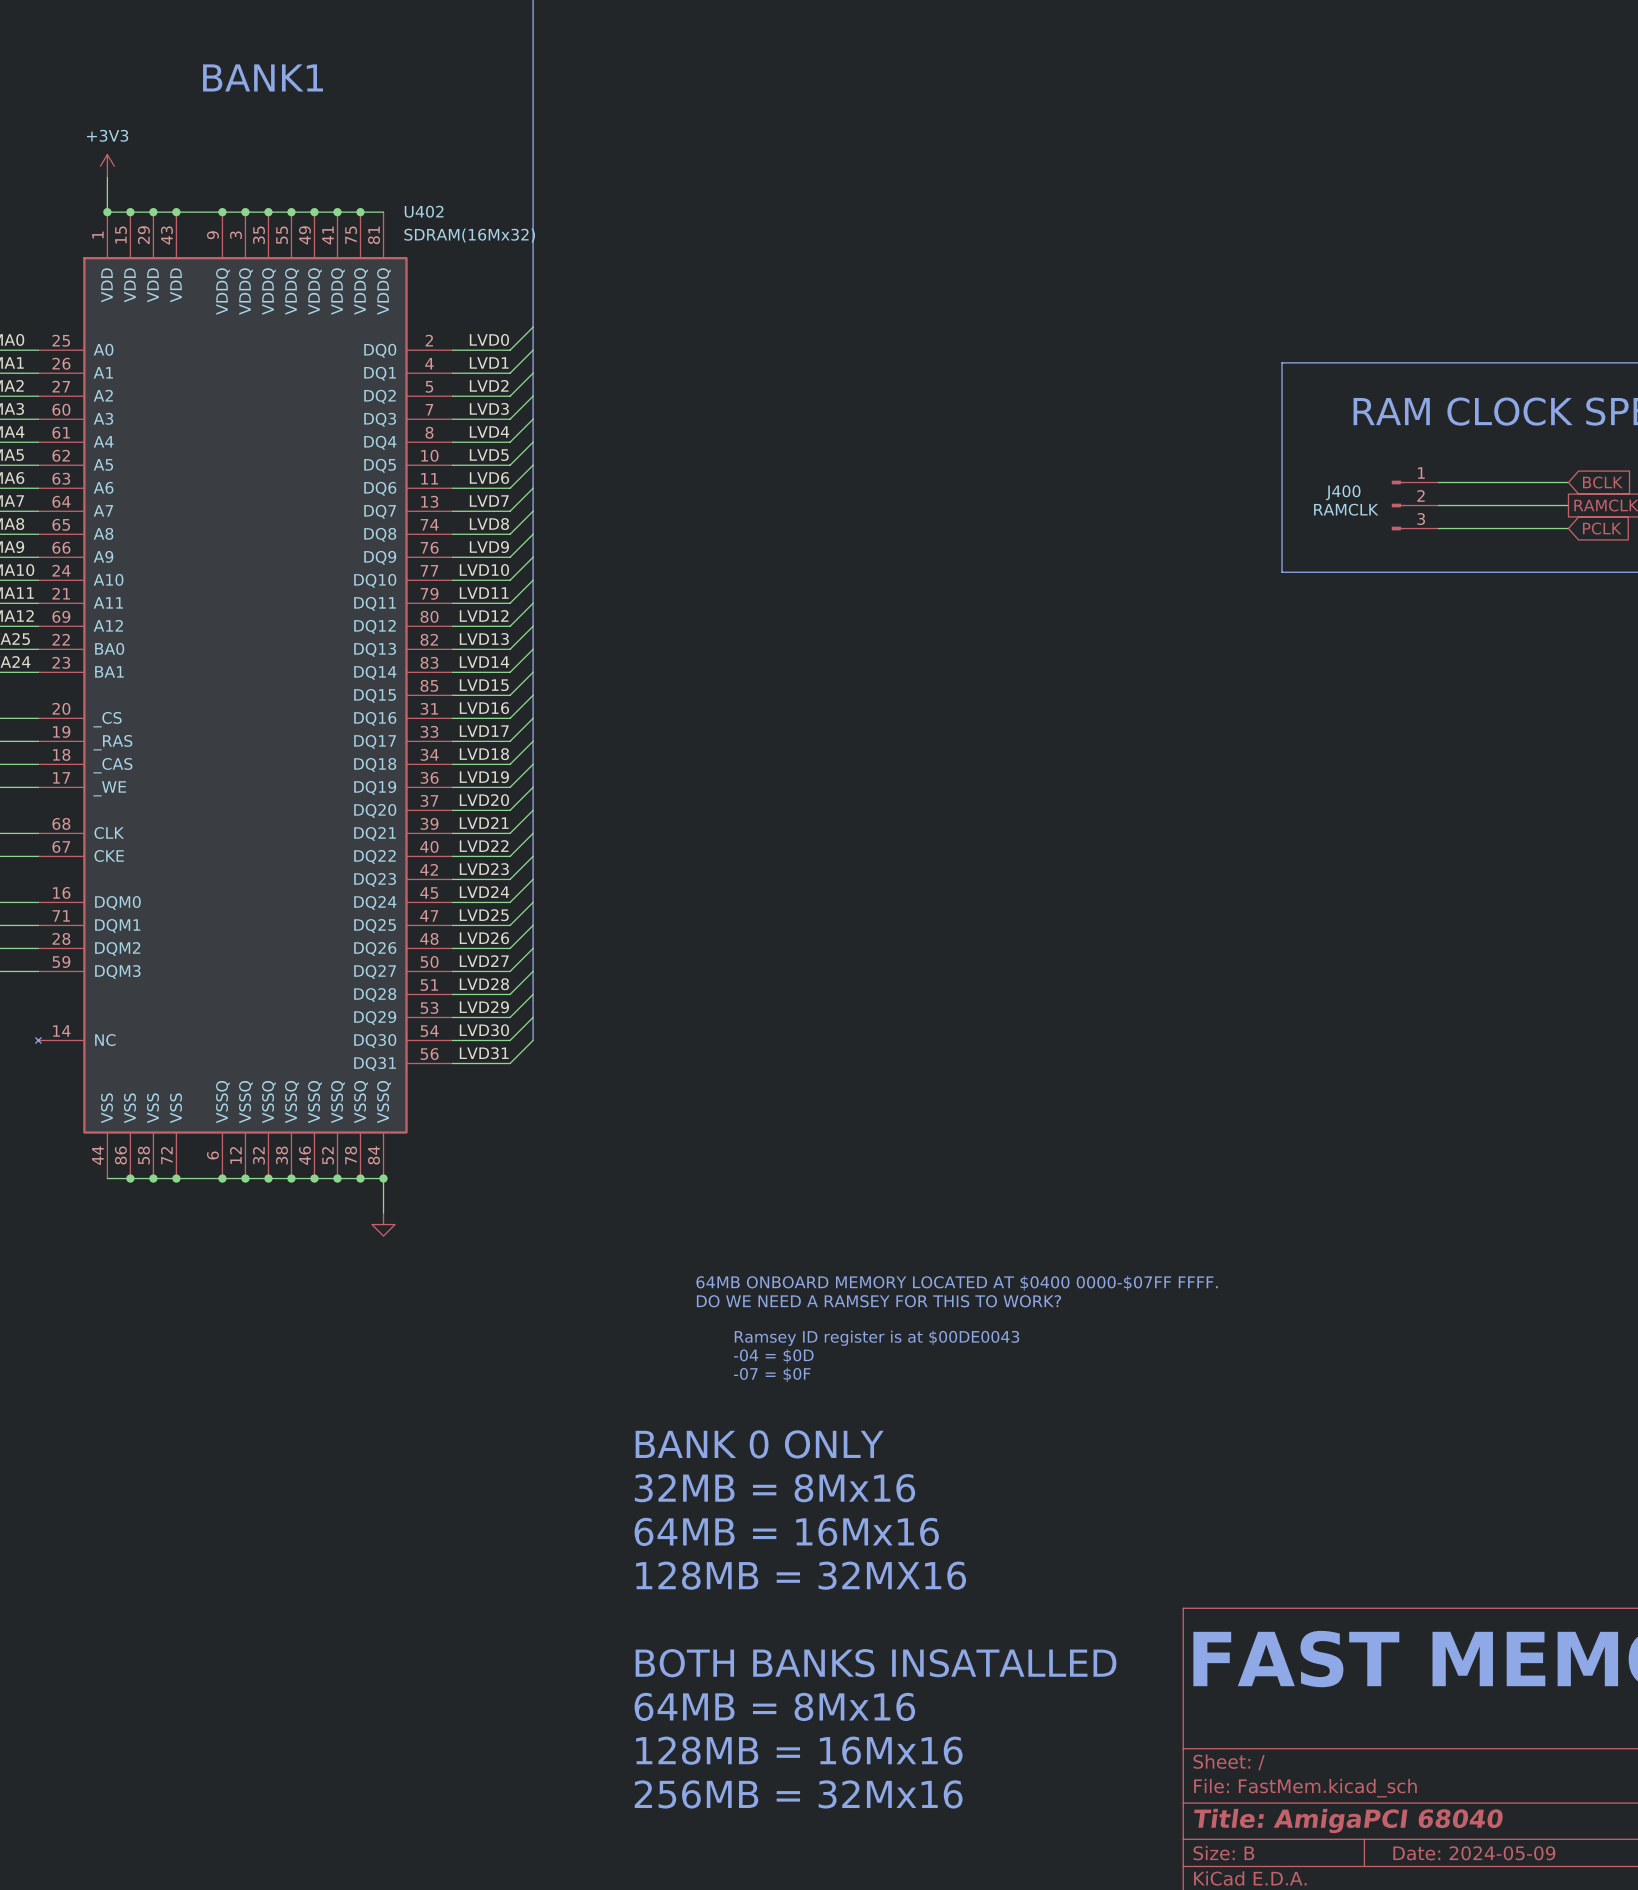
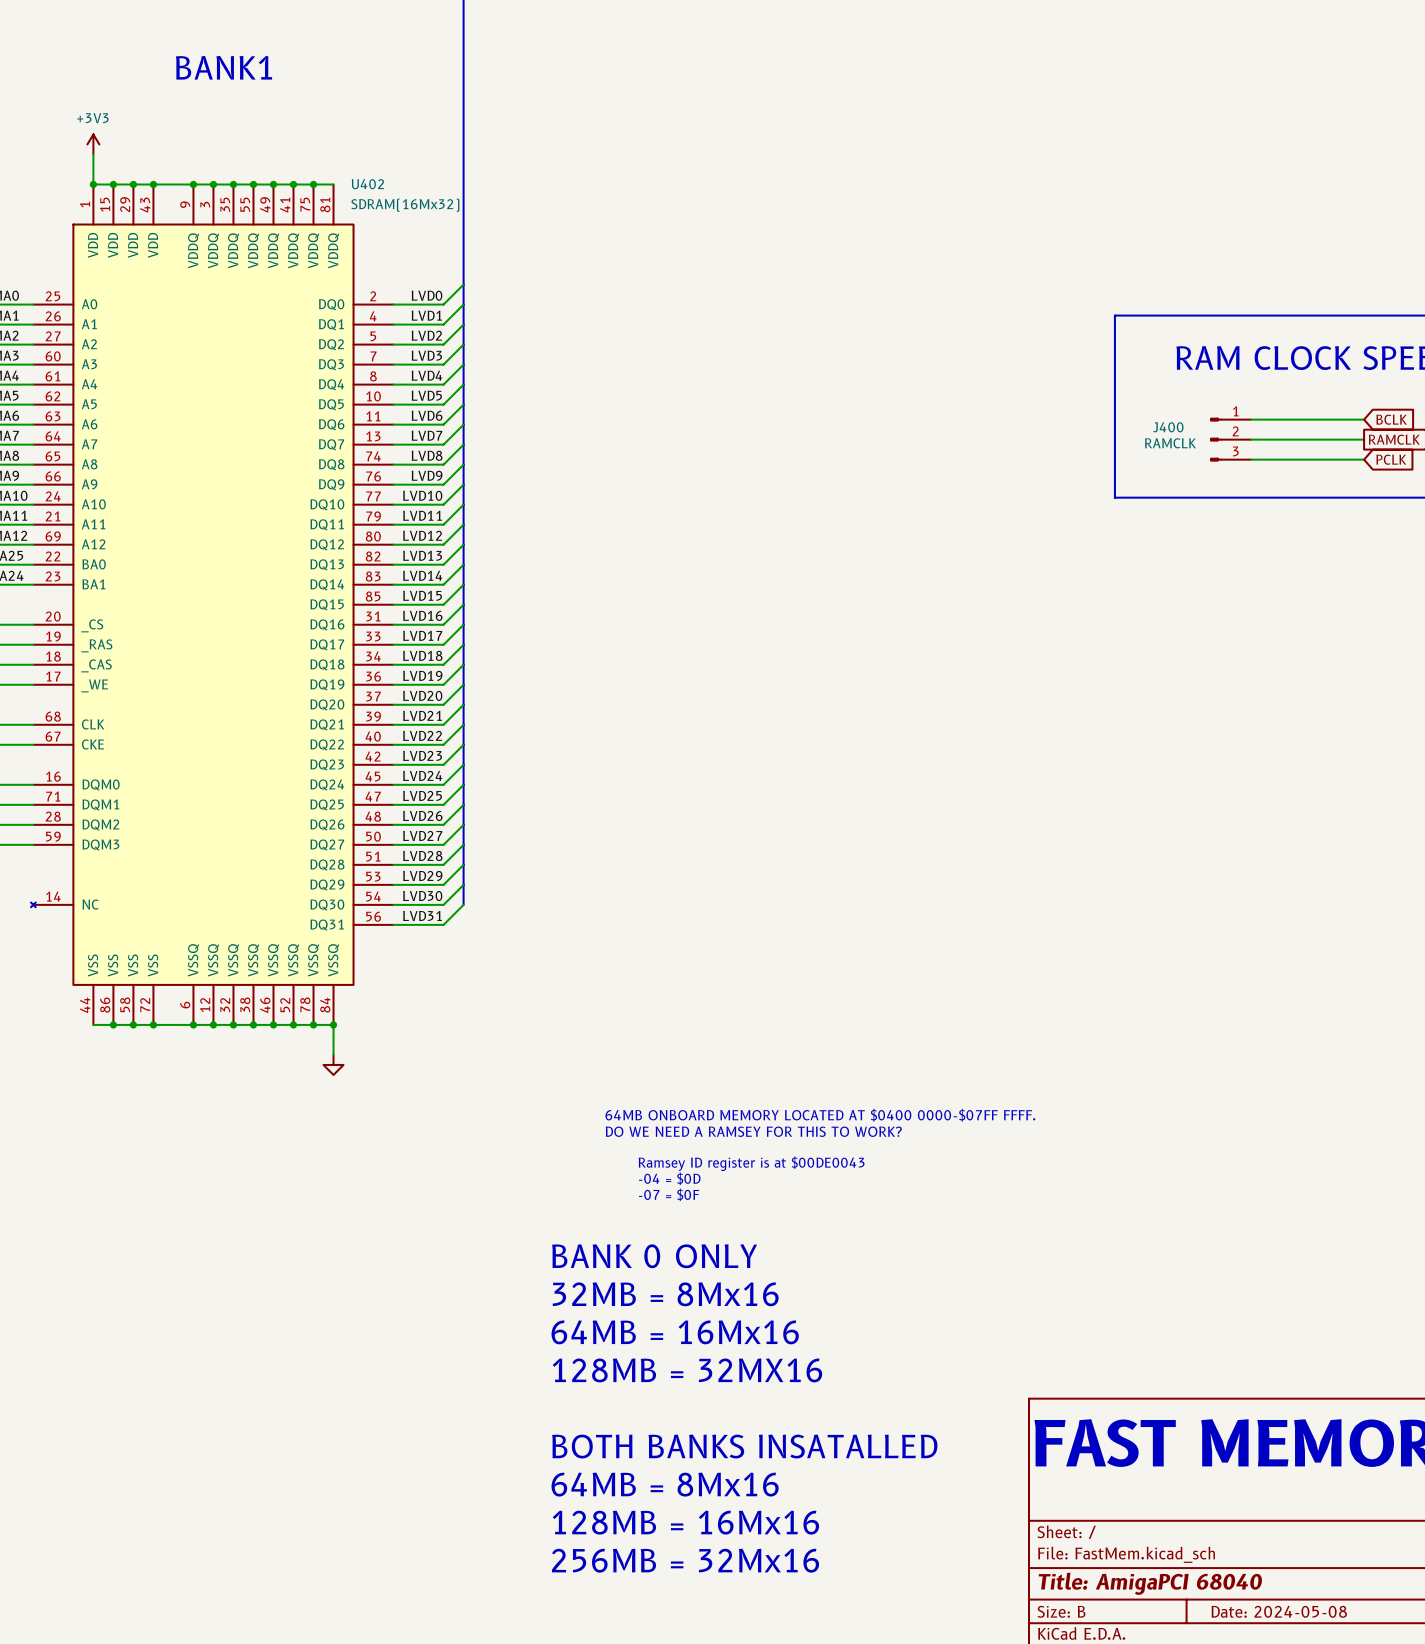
title block: Date: 2024-05-09 (1474, 1853) -> Date: 2024-05-08 (1279, 1611)

